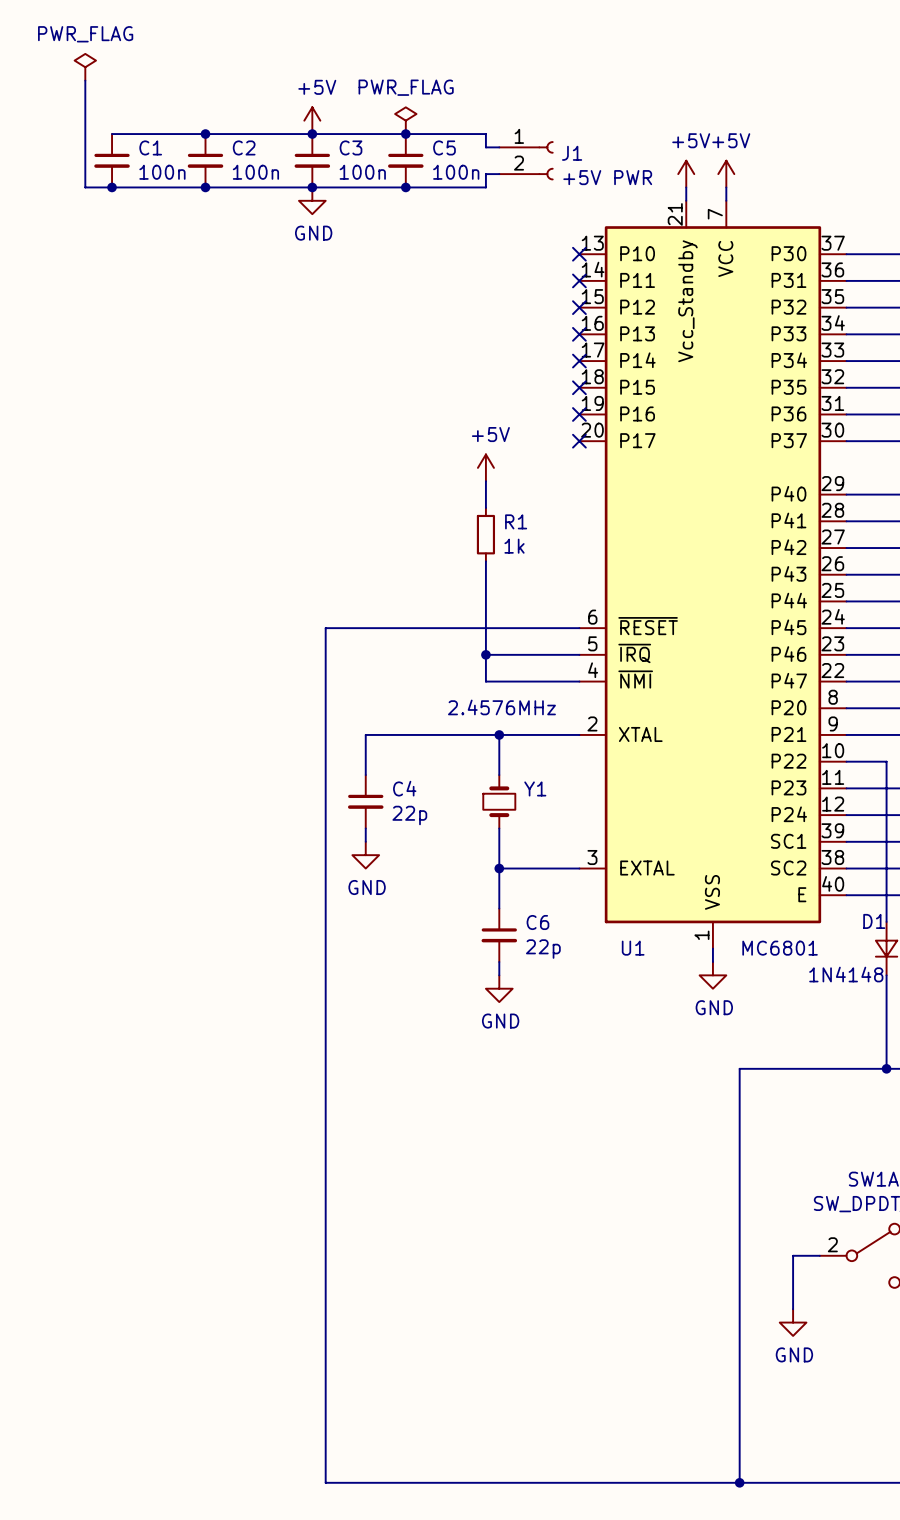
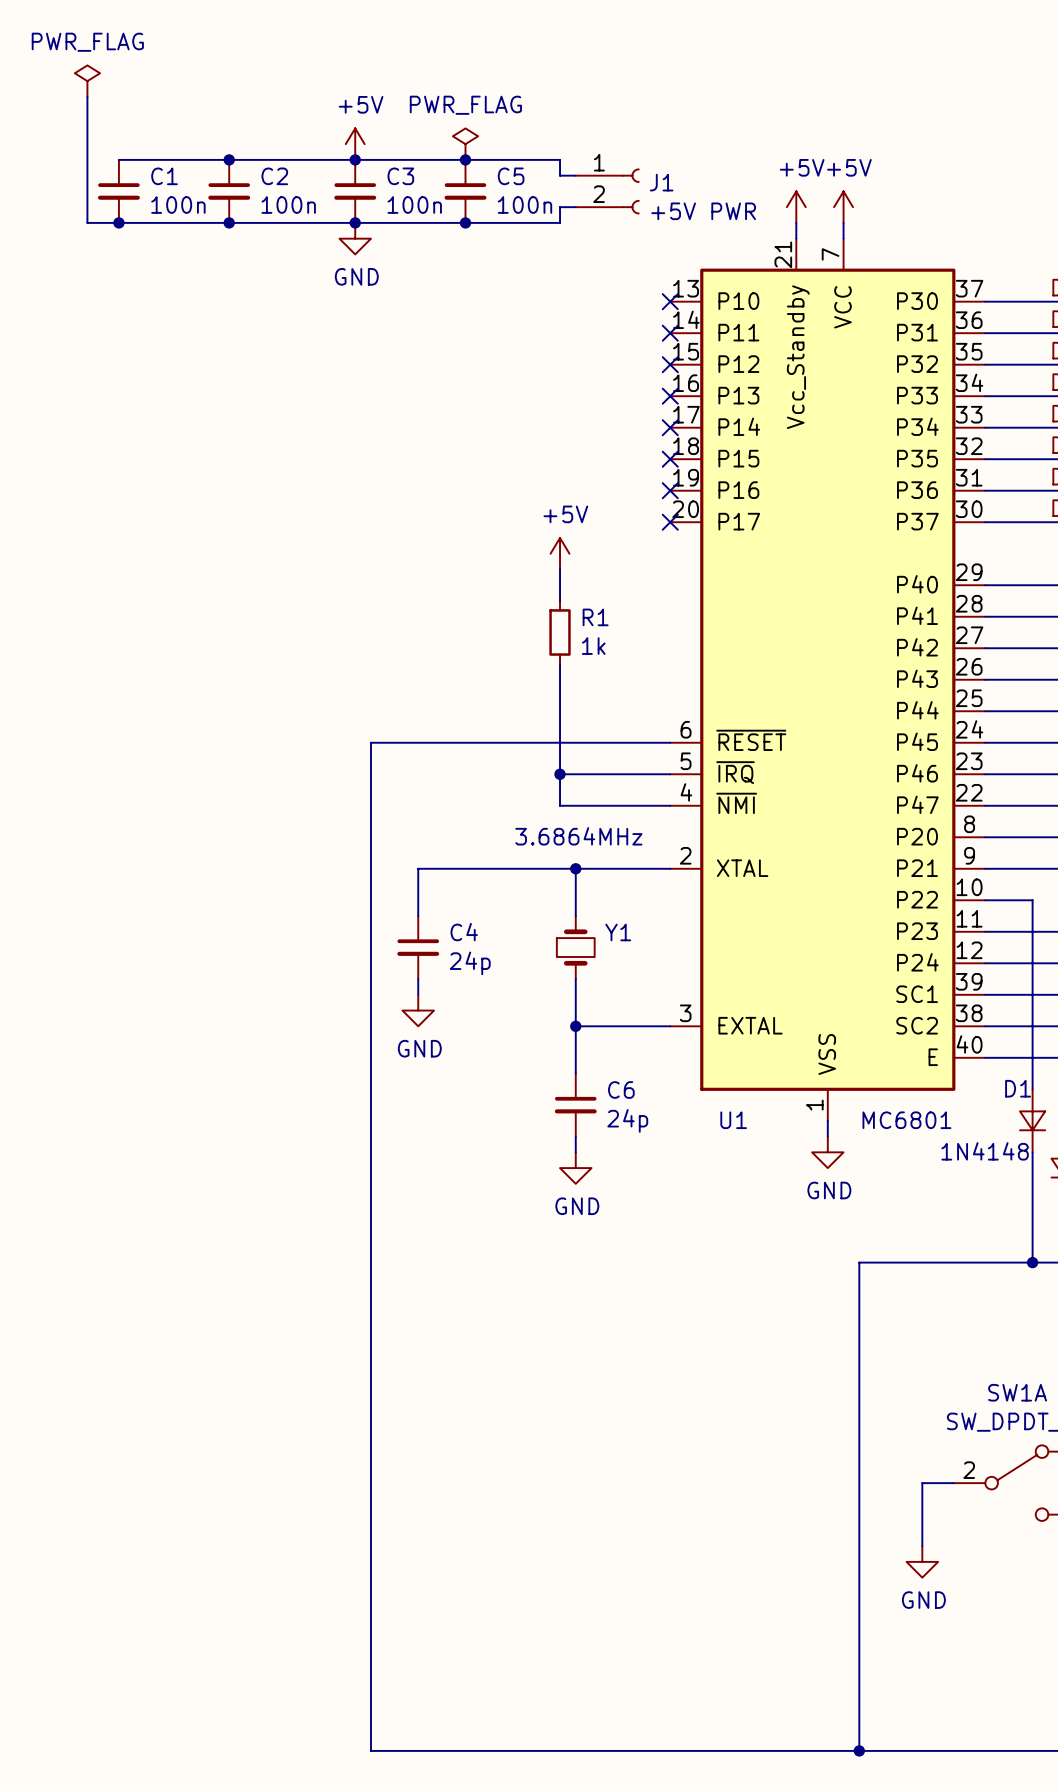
Y1 value: 2.4576MHz (501, 707) -> 3.6864MHz (578, 836)
C4 value: 22p (409, 815) -> 24p (470, 963)
C6 value: 22p (543, 949) -> 24p (627, 1120)

